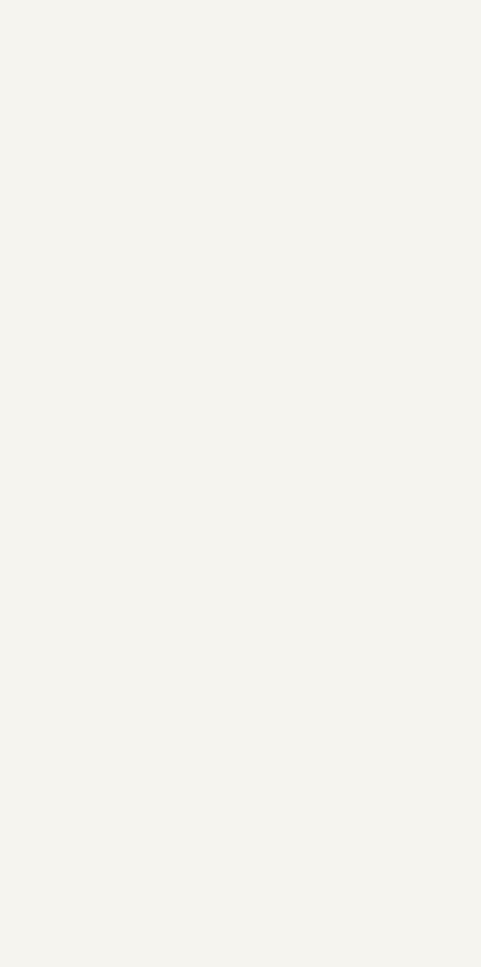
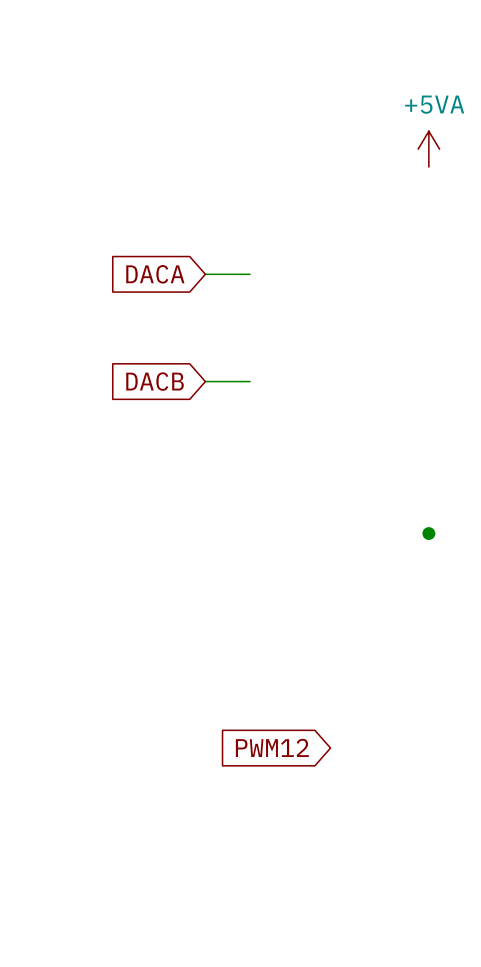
power symbol: none -> +5VA (428, 149)
global label: none -> DACA (155, 274)
wire: none -> (205, 274) (250, 274)
global label: none -> DACB (155, 381)
wire: none -> (205, 381) (250, 381)
junction: none -> (428, 533)
global label: none -> PWM12 (272, 747)

